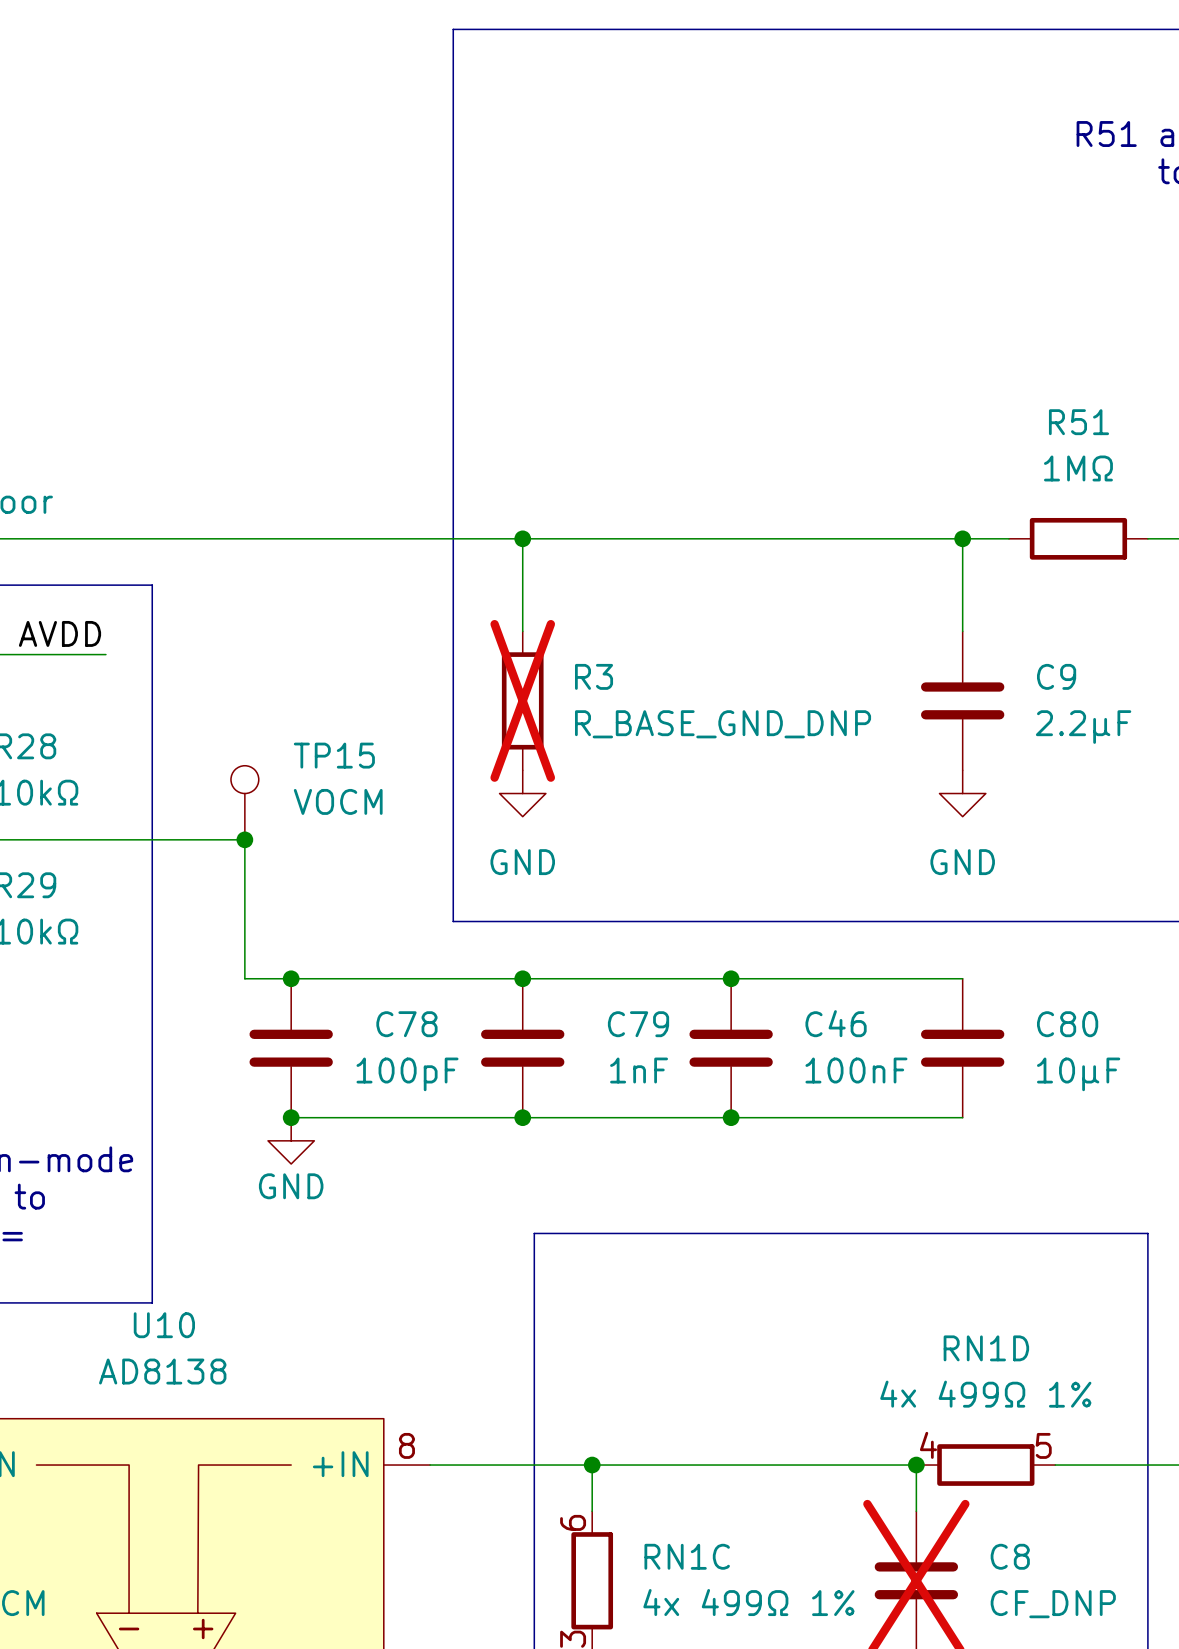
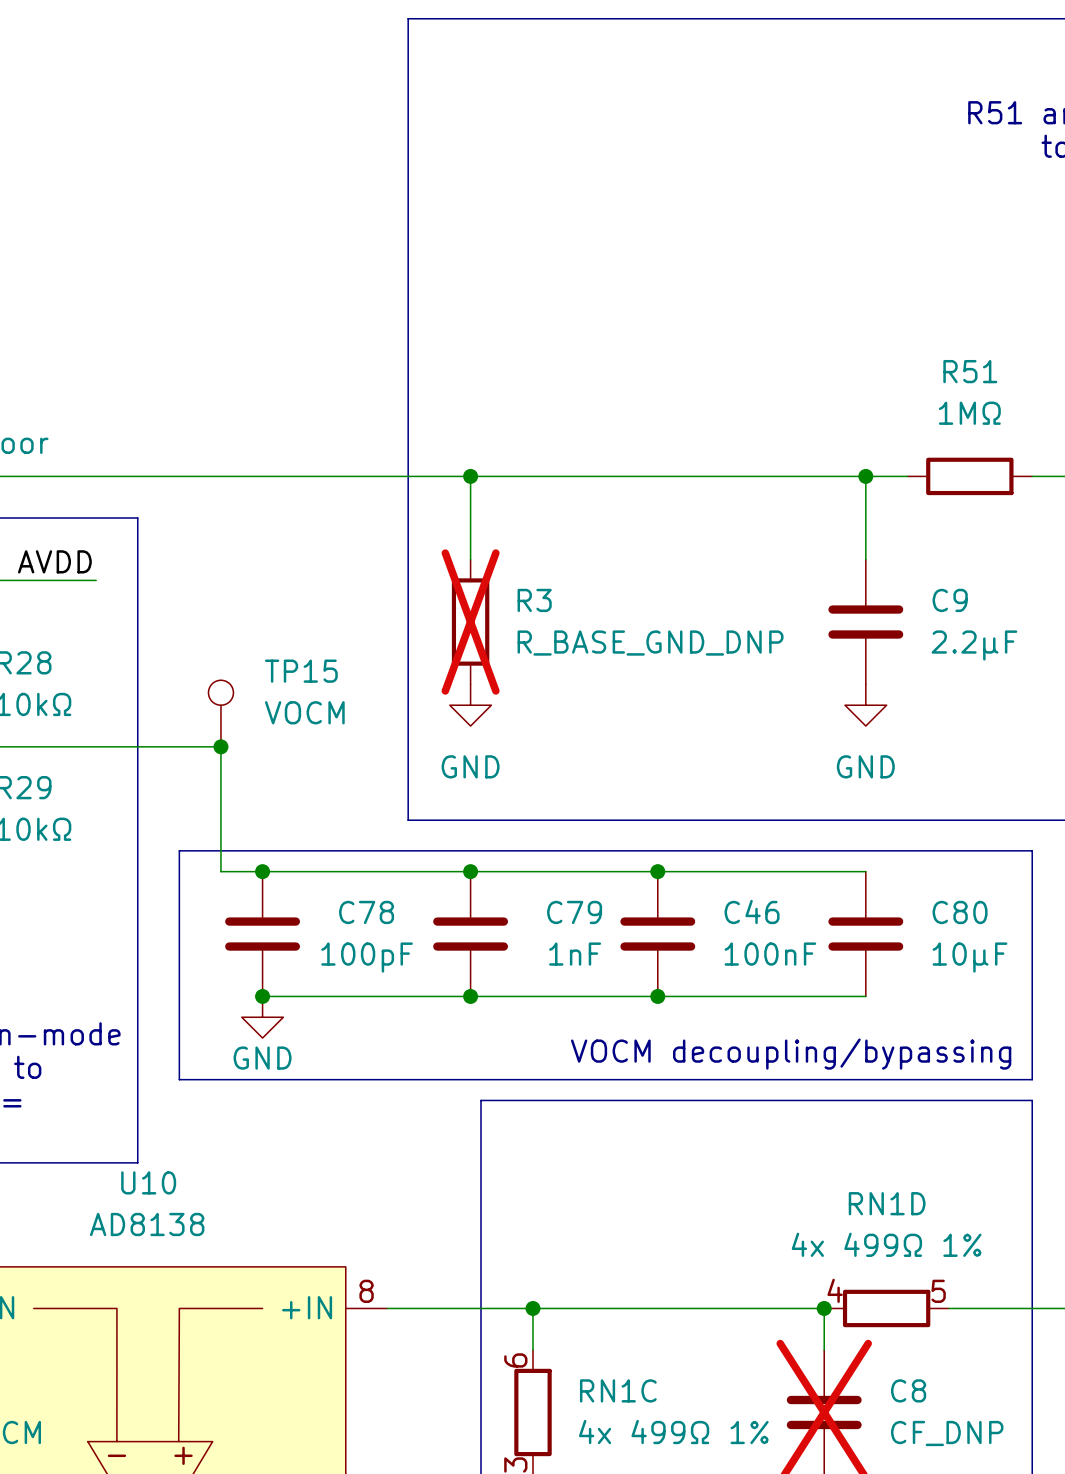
line: none -> (179, 850) (1032, 850) (1032, 1079) (179, 1079) (179, 850)
text: none -> VOCM decoupling/bypassing (791, 1054)

